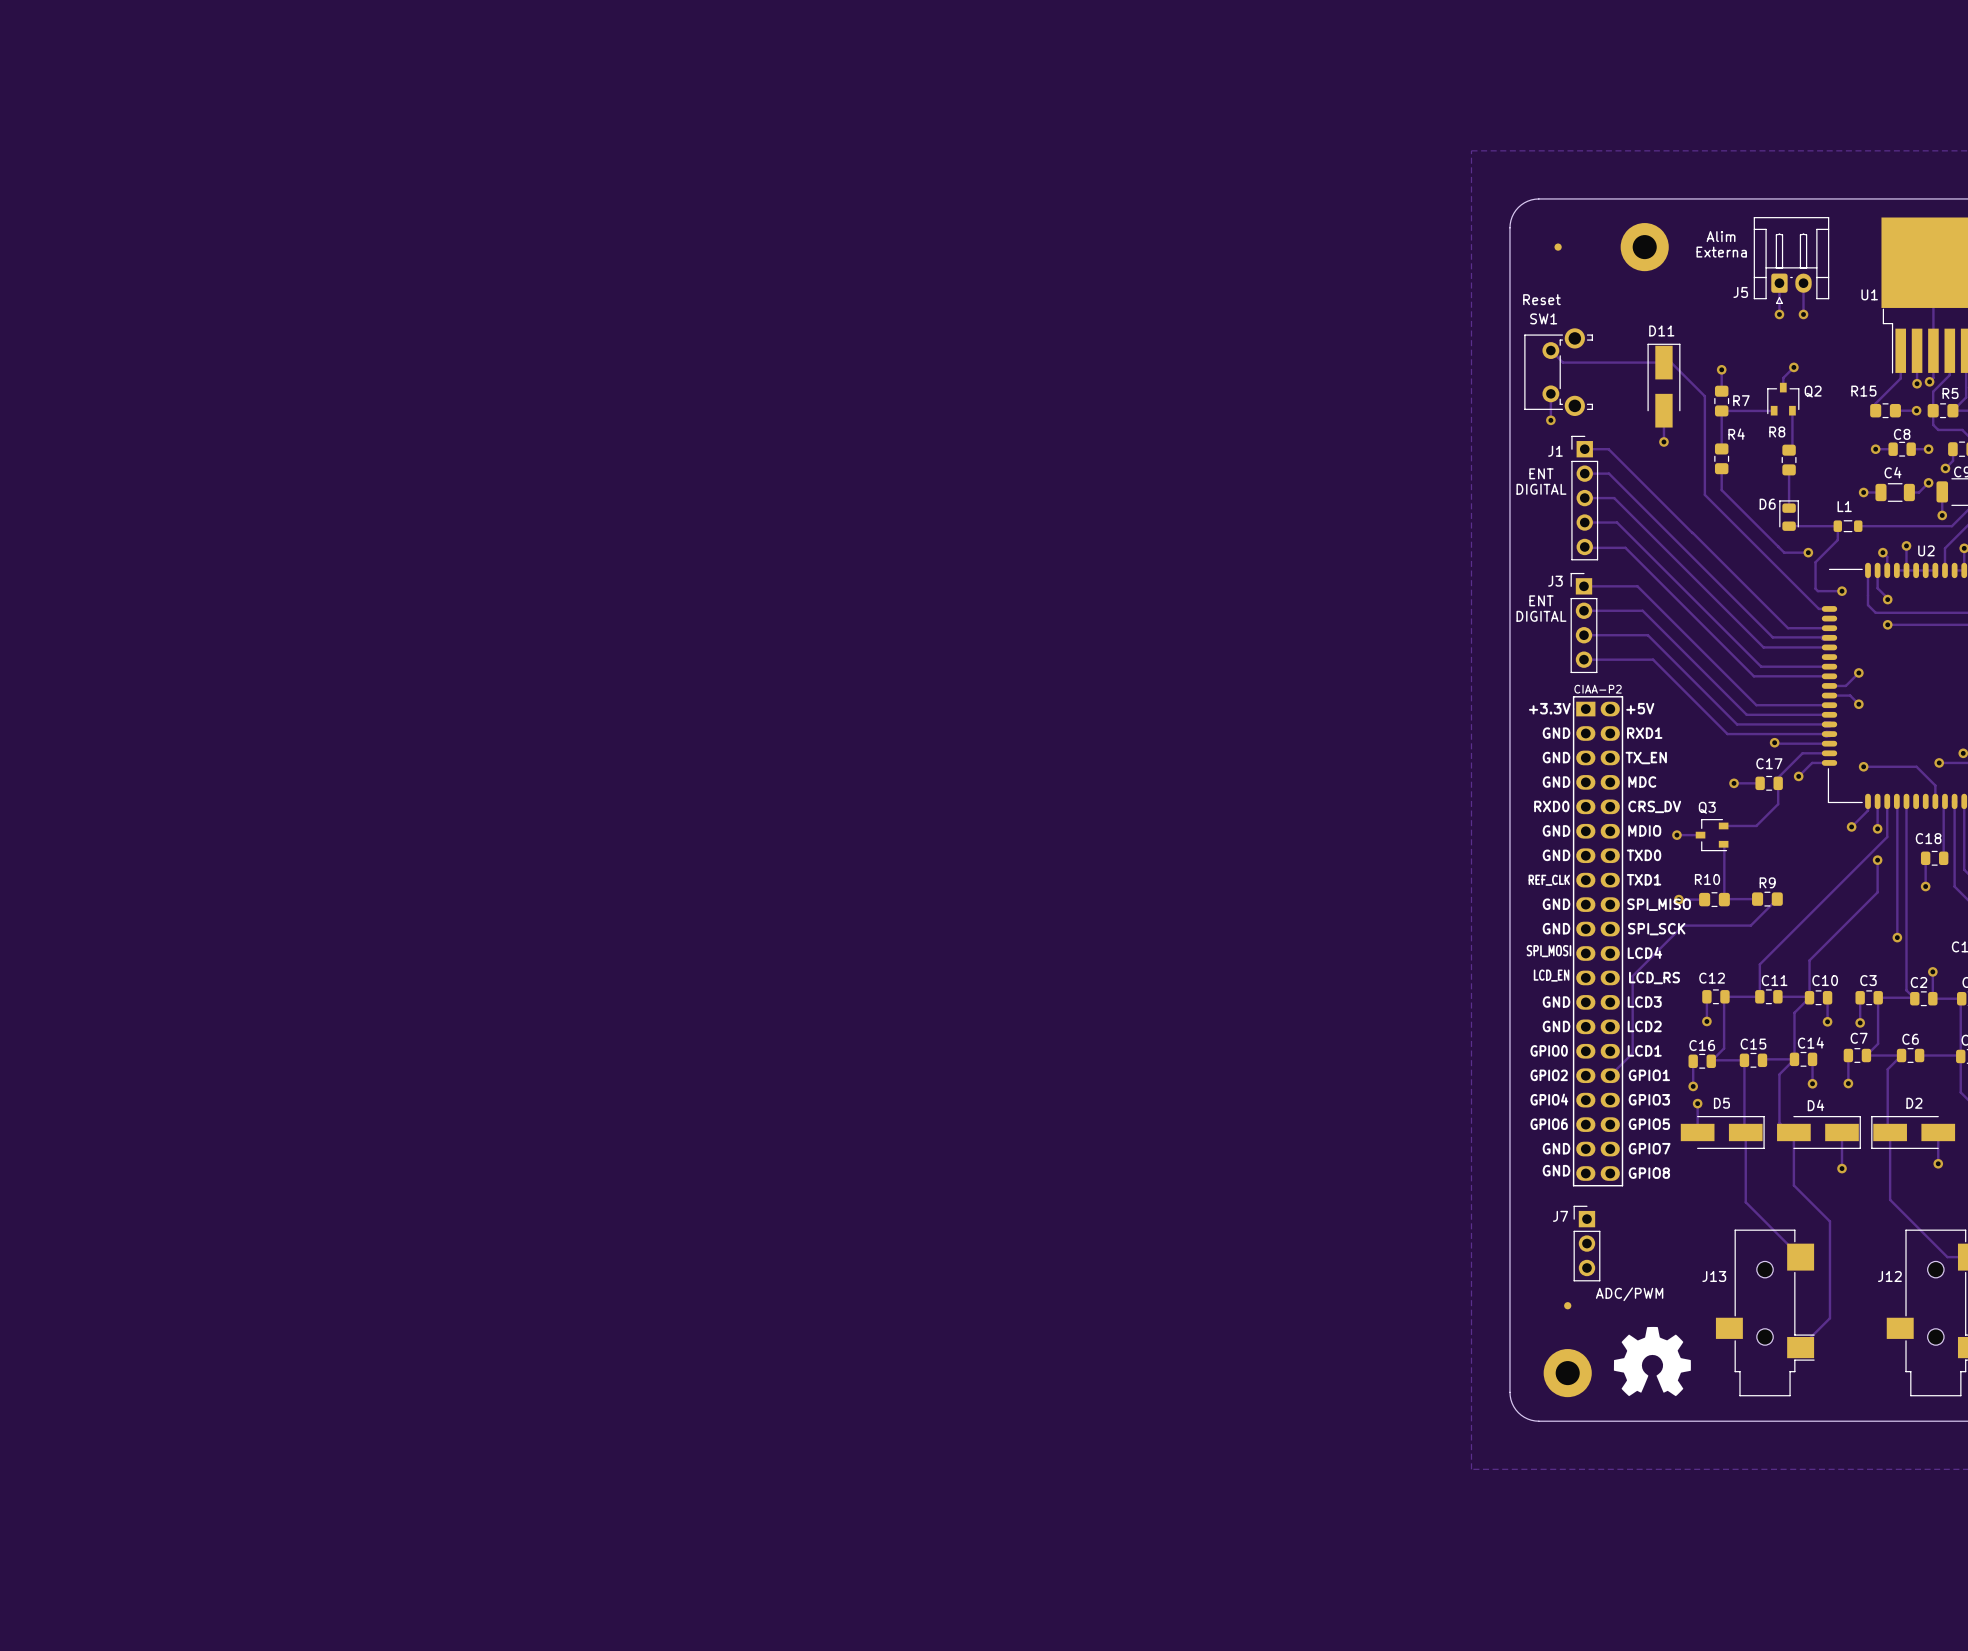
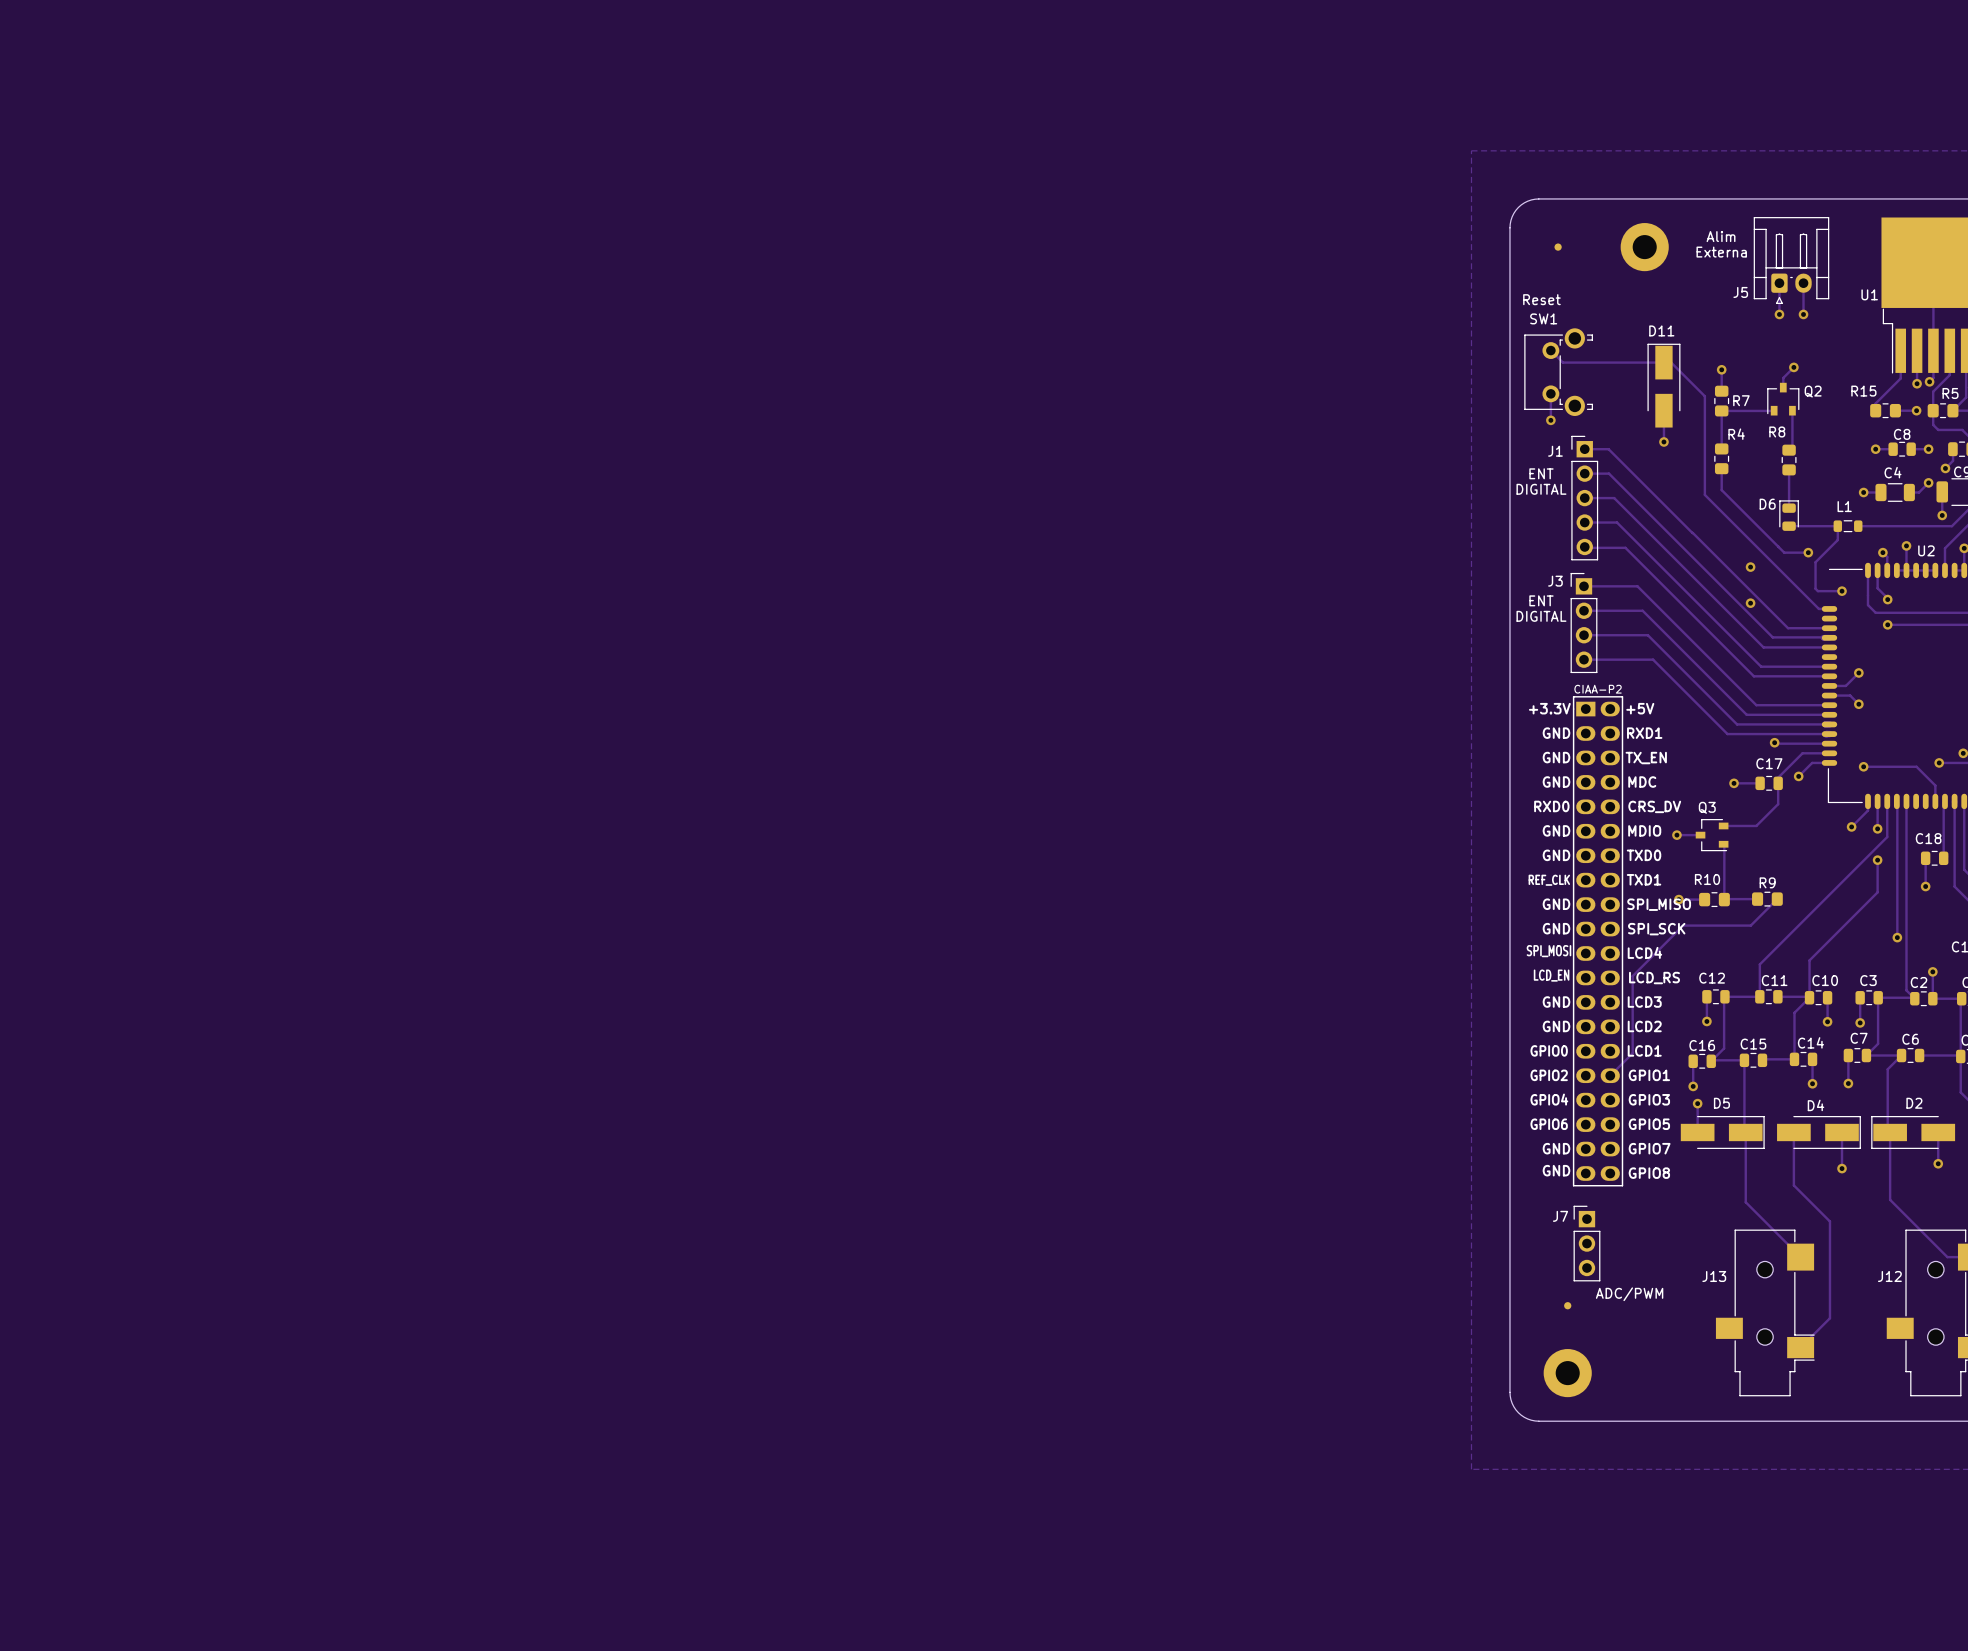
via: none -> (1750, 567)
via: none -> (1750, 603)
track: (1794, 1059) (1779, 1074) -> none
track: (1779, 1074) (1779, 1122) (1789, 1132) (1798, 1132) -> none
drawing: [1613, 1326, 1691, 1397] -> none

